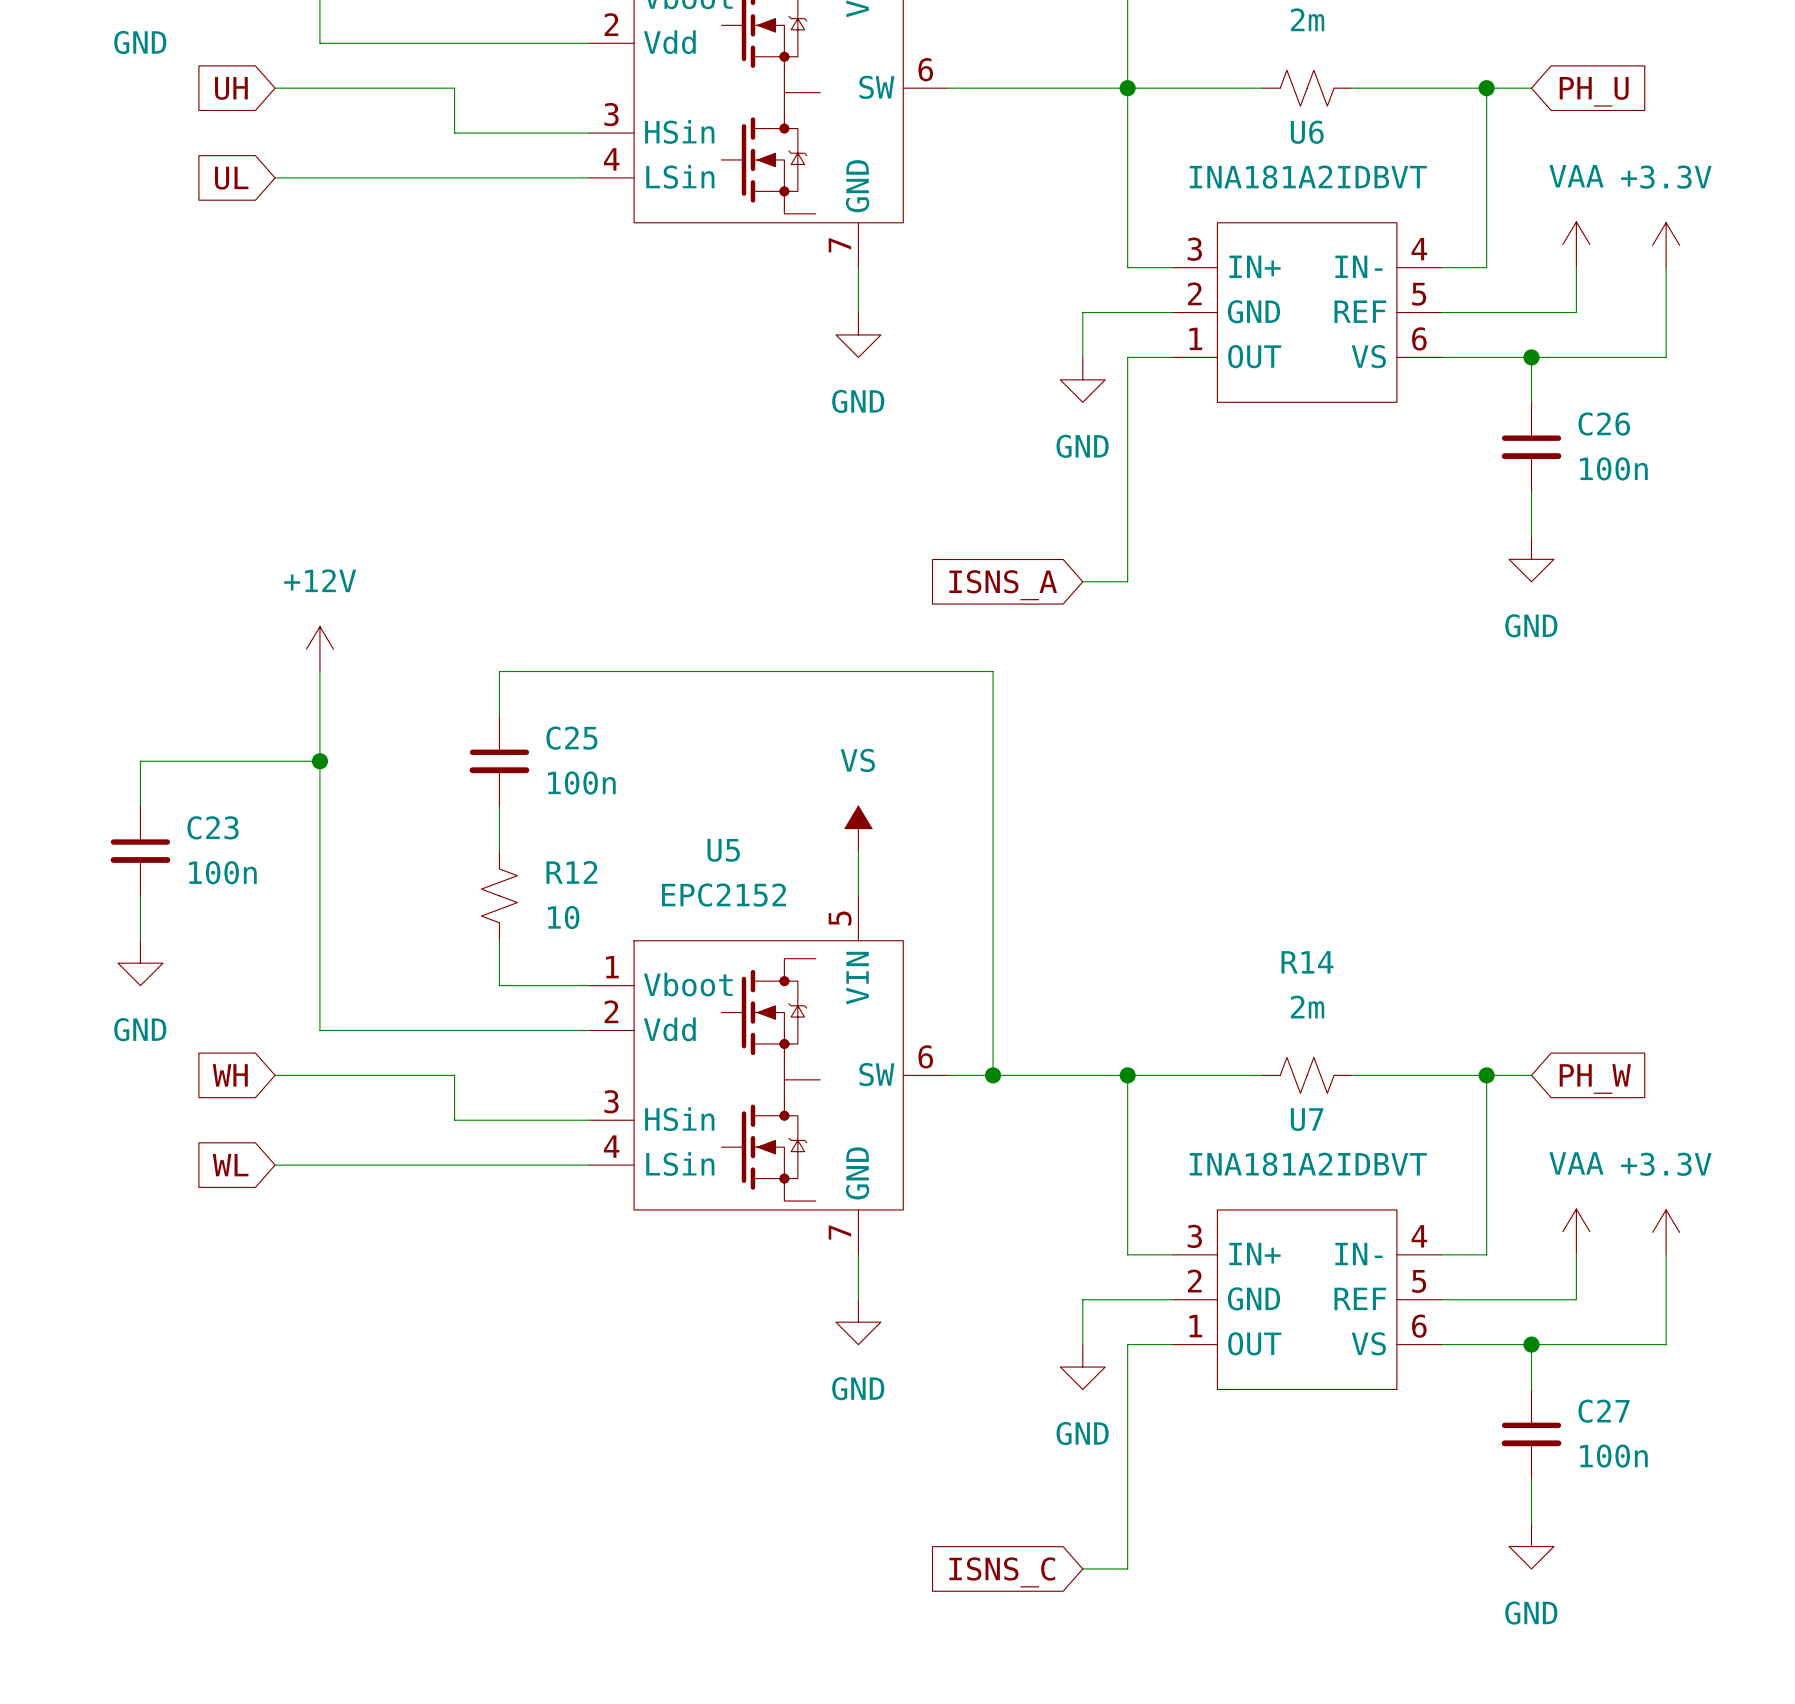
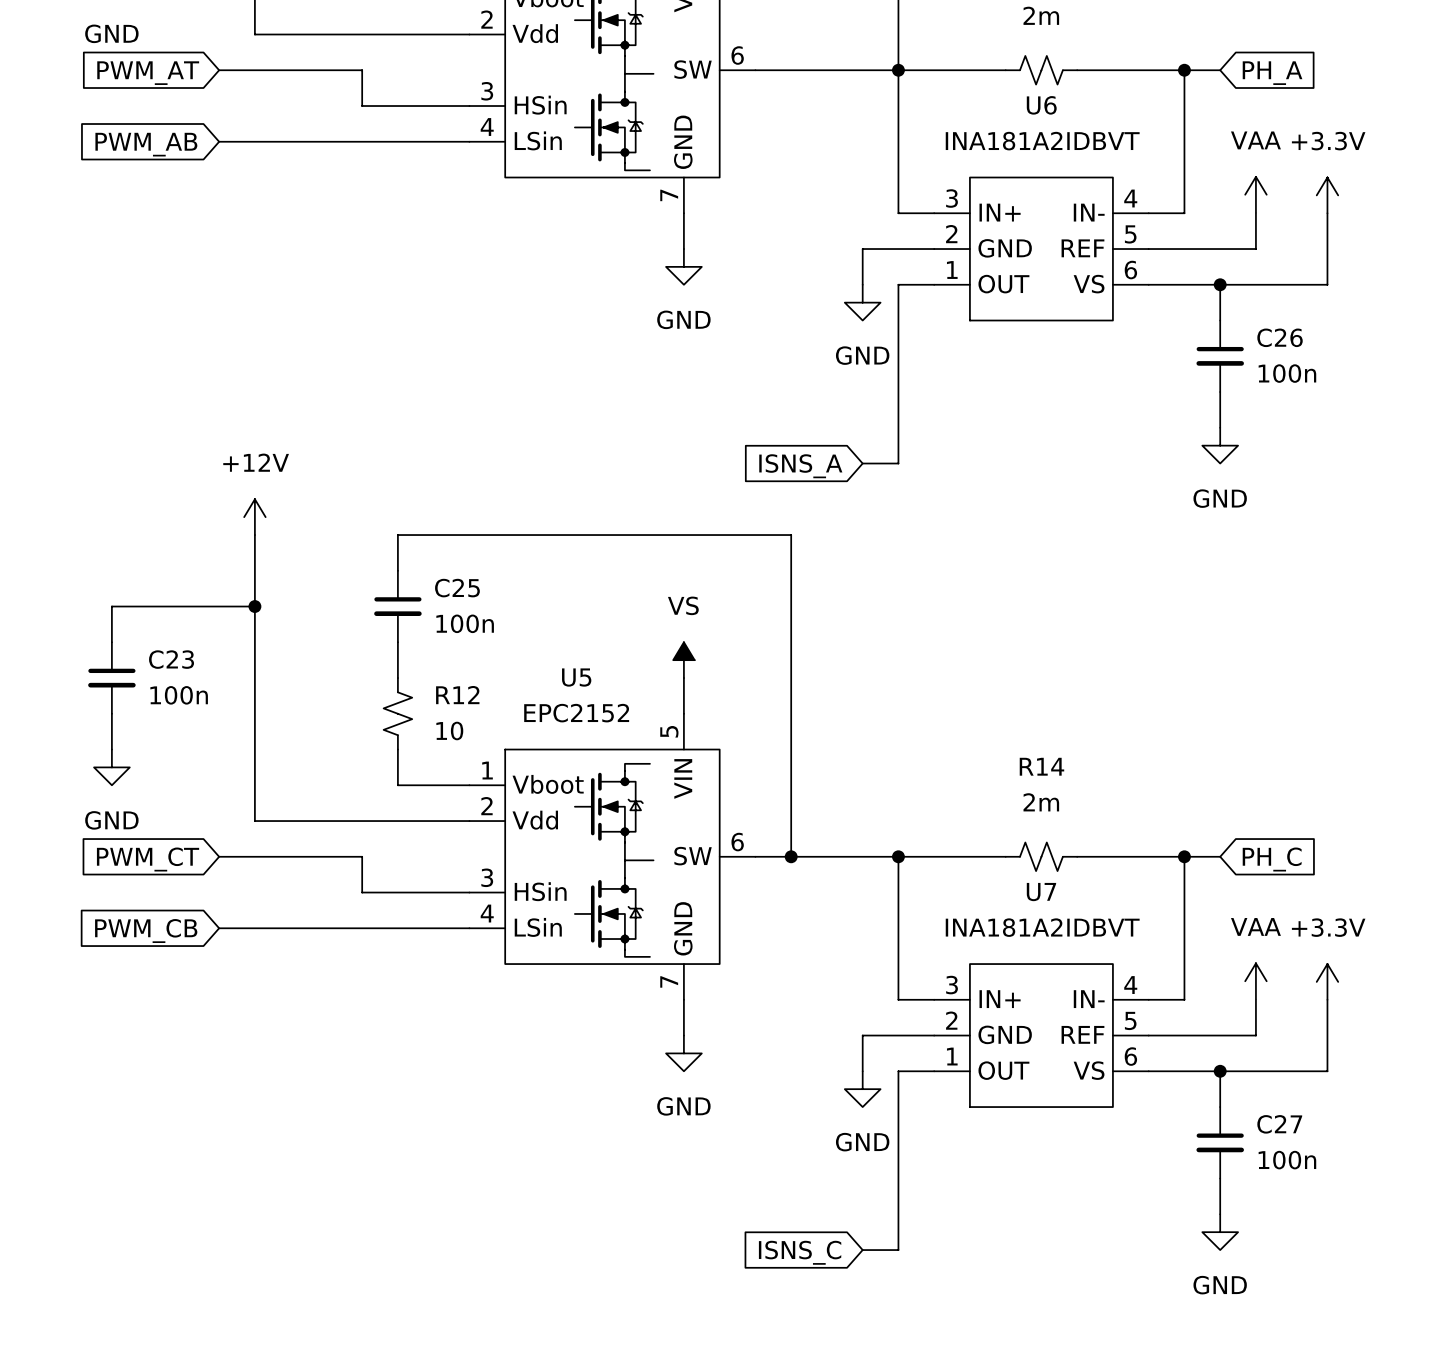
global label: UH (231, 88) -> PWM_AT (148, 73)
global label: PH_U (1594, 91) -> PH_A (1272, 73)
global label: UL (231, 178) -> PWM_AB (146, 144)
global label: WH (230, 1075) -> PWM_CT (148, 859)
global label: PH_W (1595, 1078) -> PH_C (1272, 859)
global label: WL (230, 1165) -> PWM_CB (146, 931)

